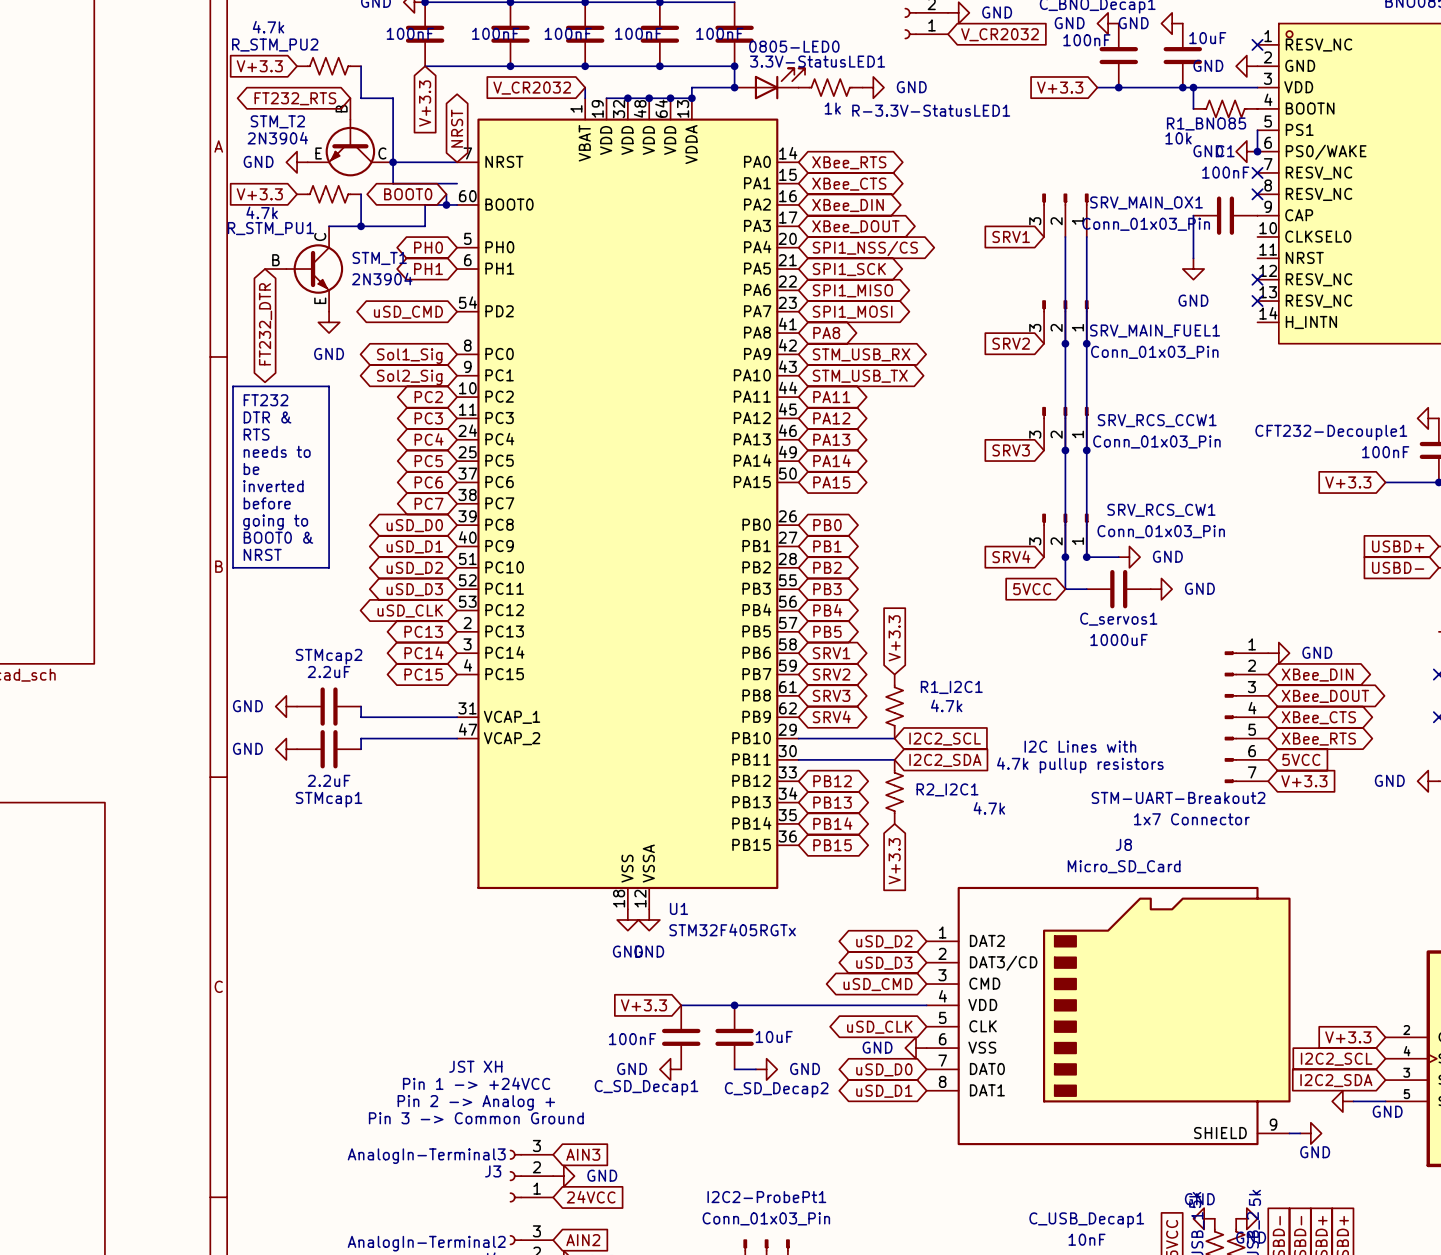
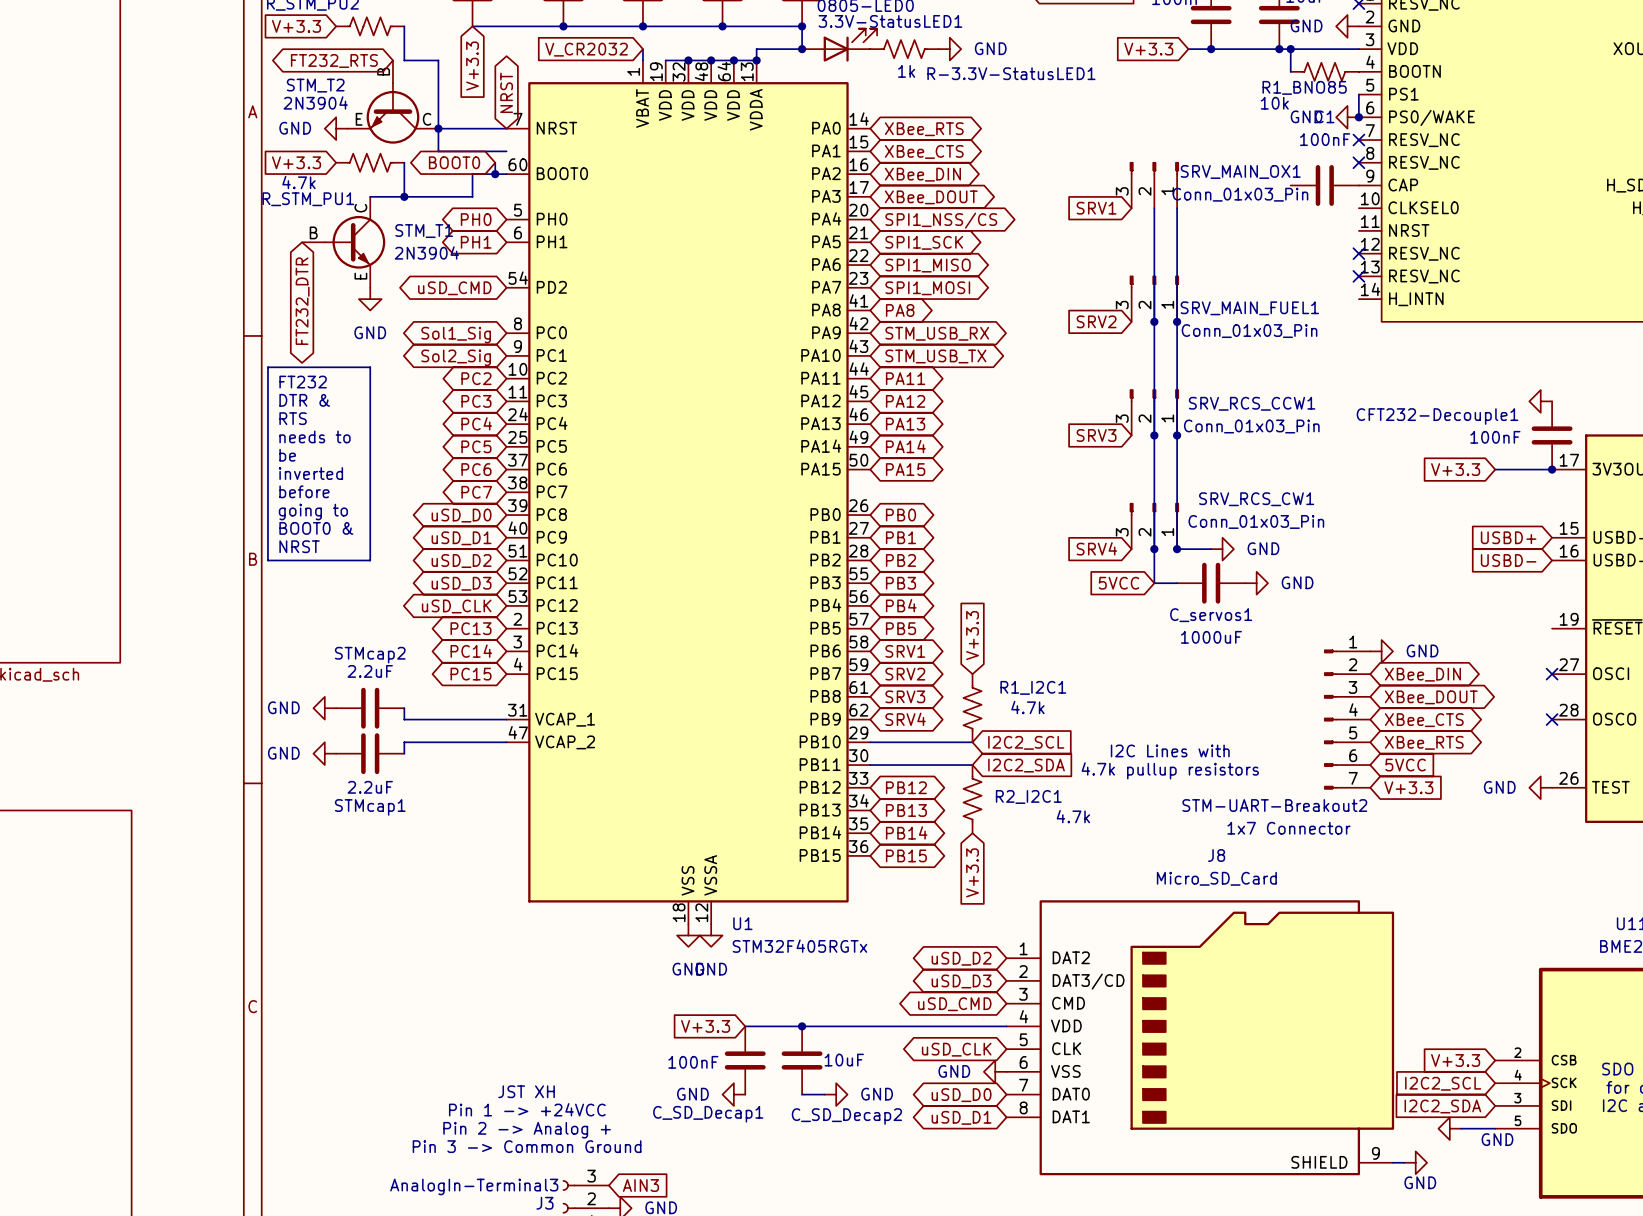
wire: (1193, 215) (1193, 258) -> none
power symbol: GND (1193, 269) -> none

